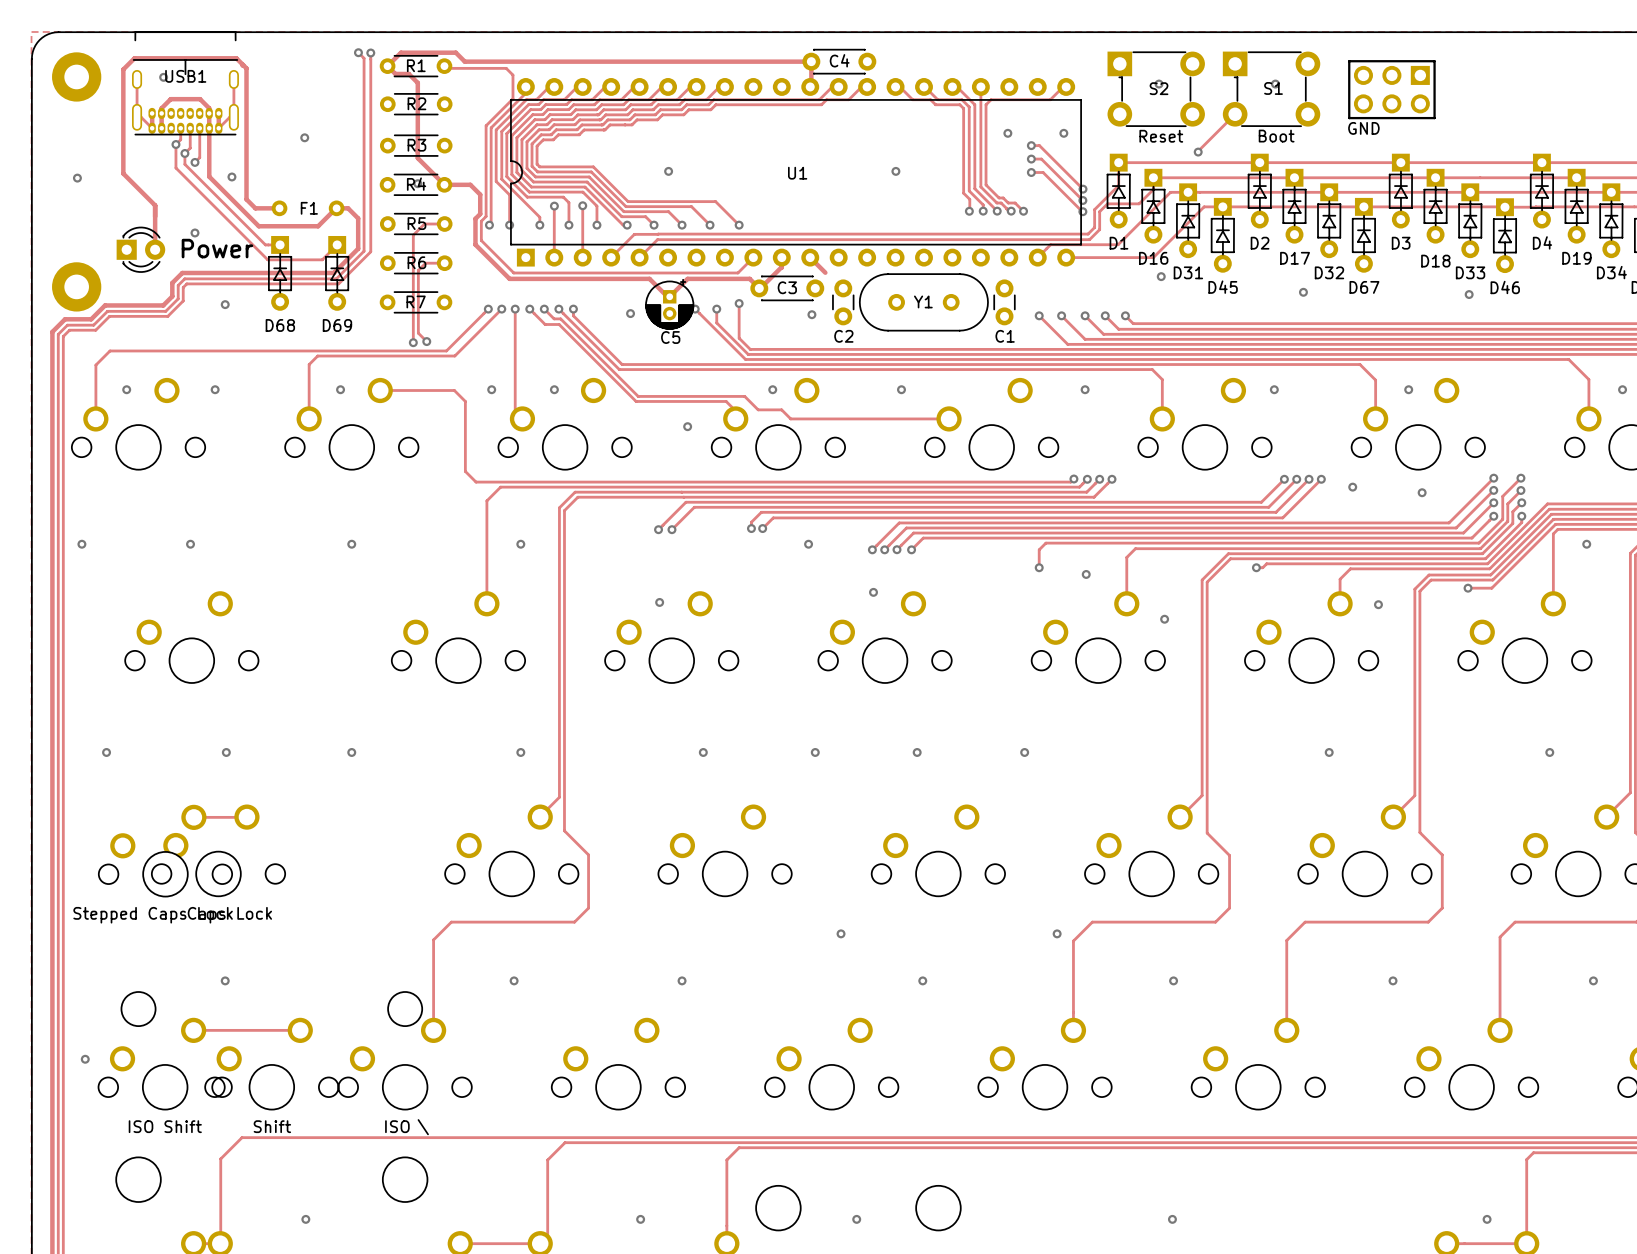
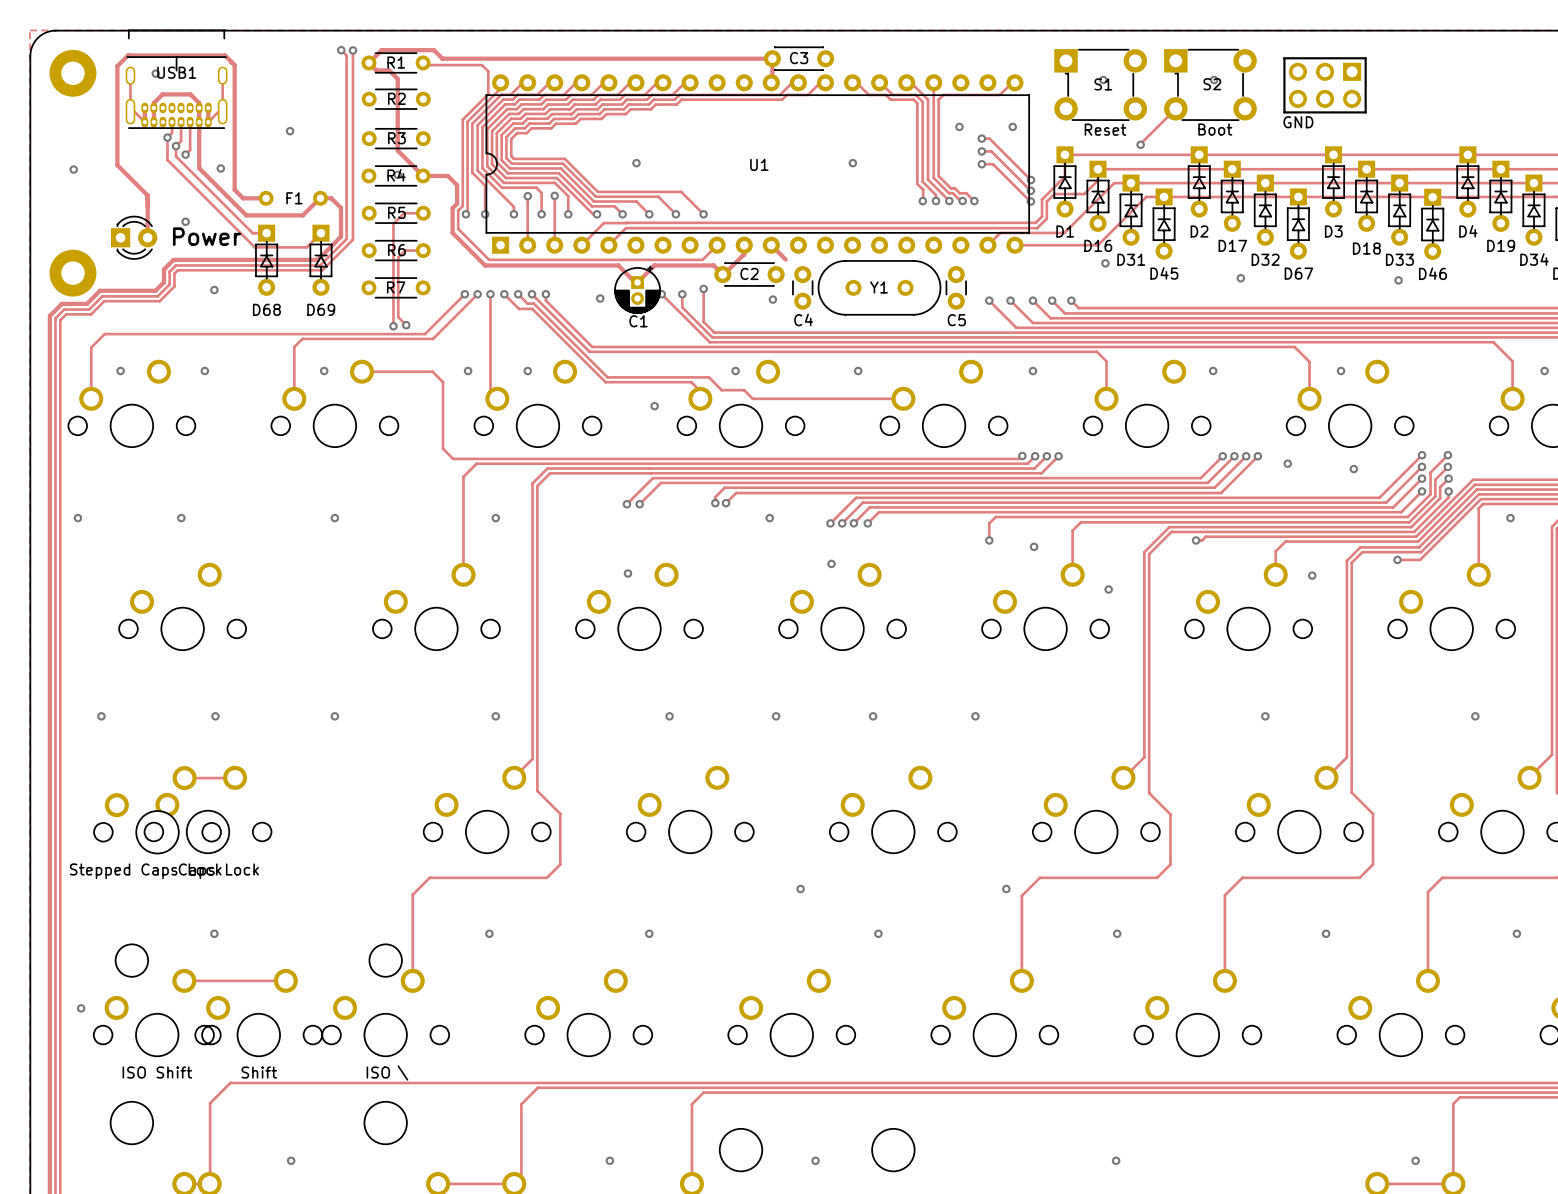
C4 name: C4 (839, 60) -> C3 (799, 58)
S2 name: S2 (1159, 88) -> S1 (1103, 84)
S1 name: S1 (1273, 88) -> S2 (1212, 84)
C3 name: C3 (787, 287) -> C2 (749, 273)
C2 name: C2 (843, 336) -> C4 (803, 319)
C1 name: C1 (1005, 336) -> C5 (956, 320)
C5 name: C5 (670, 337) -> C1 (638, 321)

